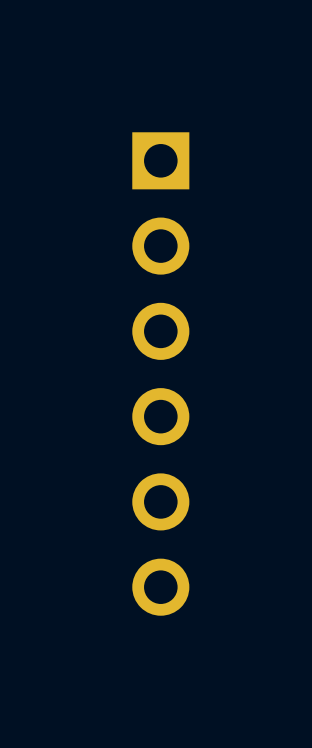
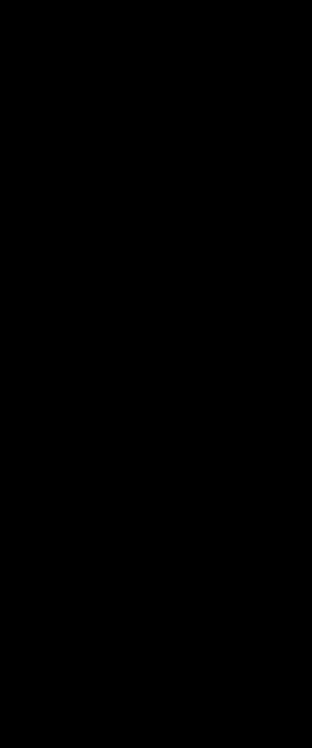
part: (160, 374) -> none

